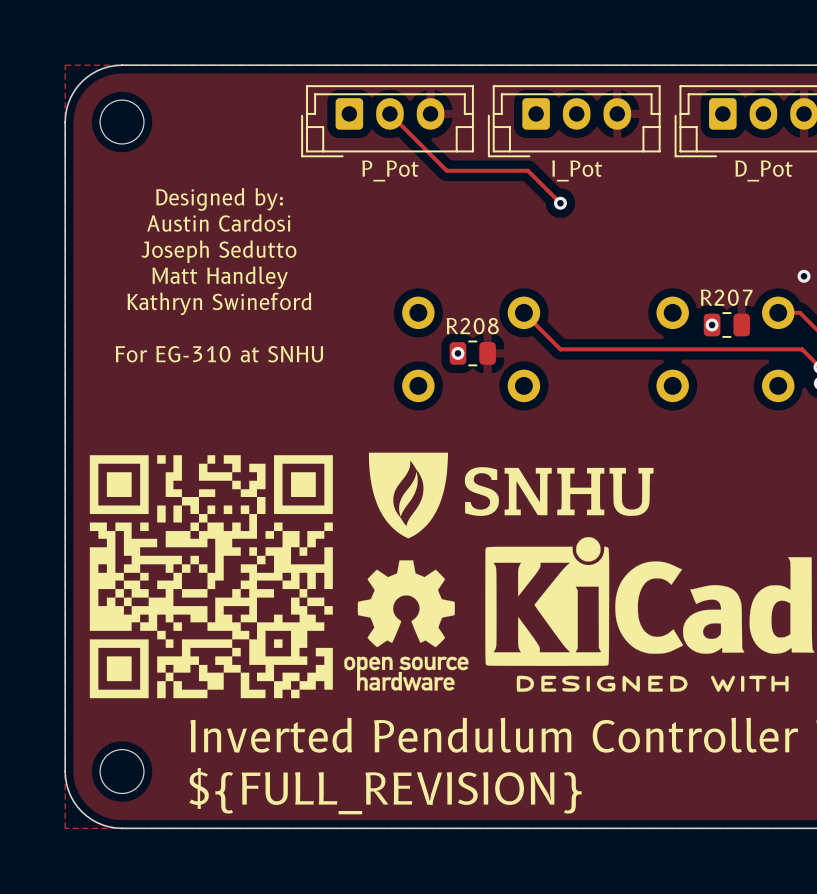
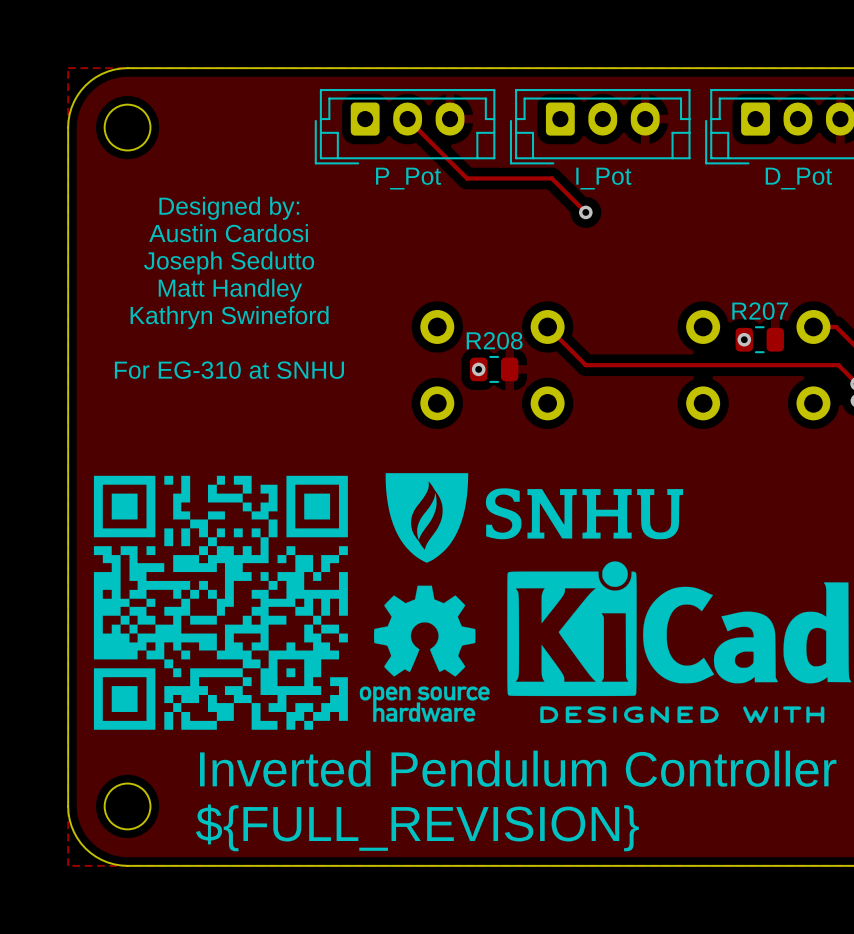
via: (804, 276) -> none

